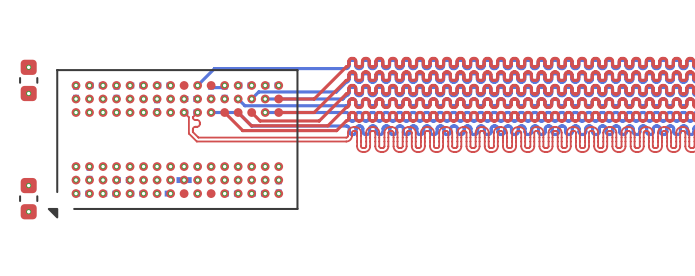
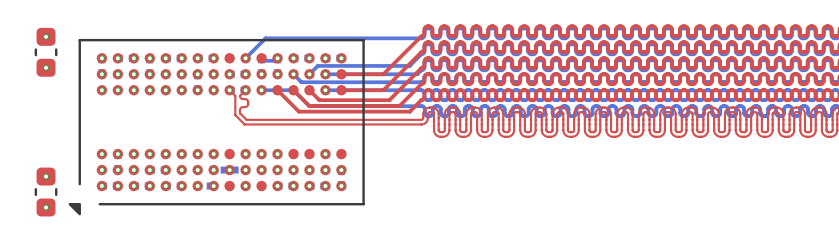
via: (184, 166) -> none
via: (238, 166) -> none
via: (251, 166) -> none
via: (278, 166) -> none

